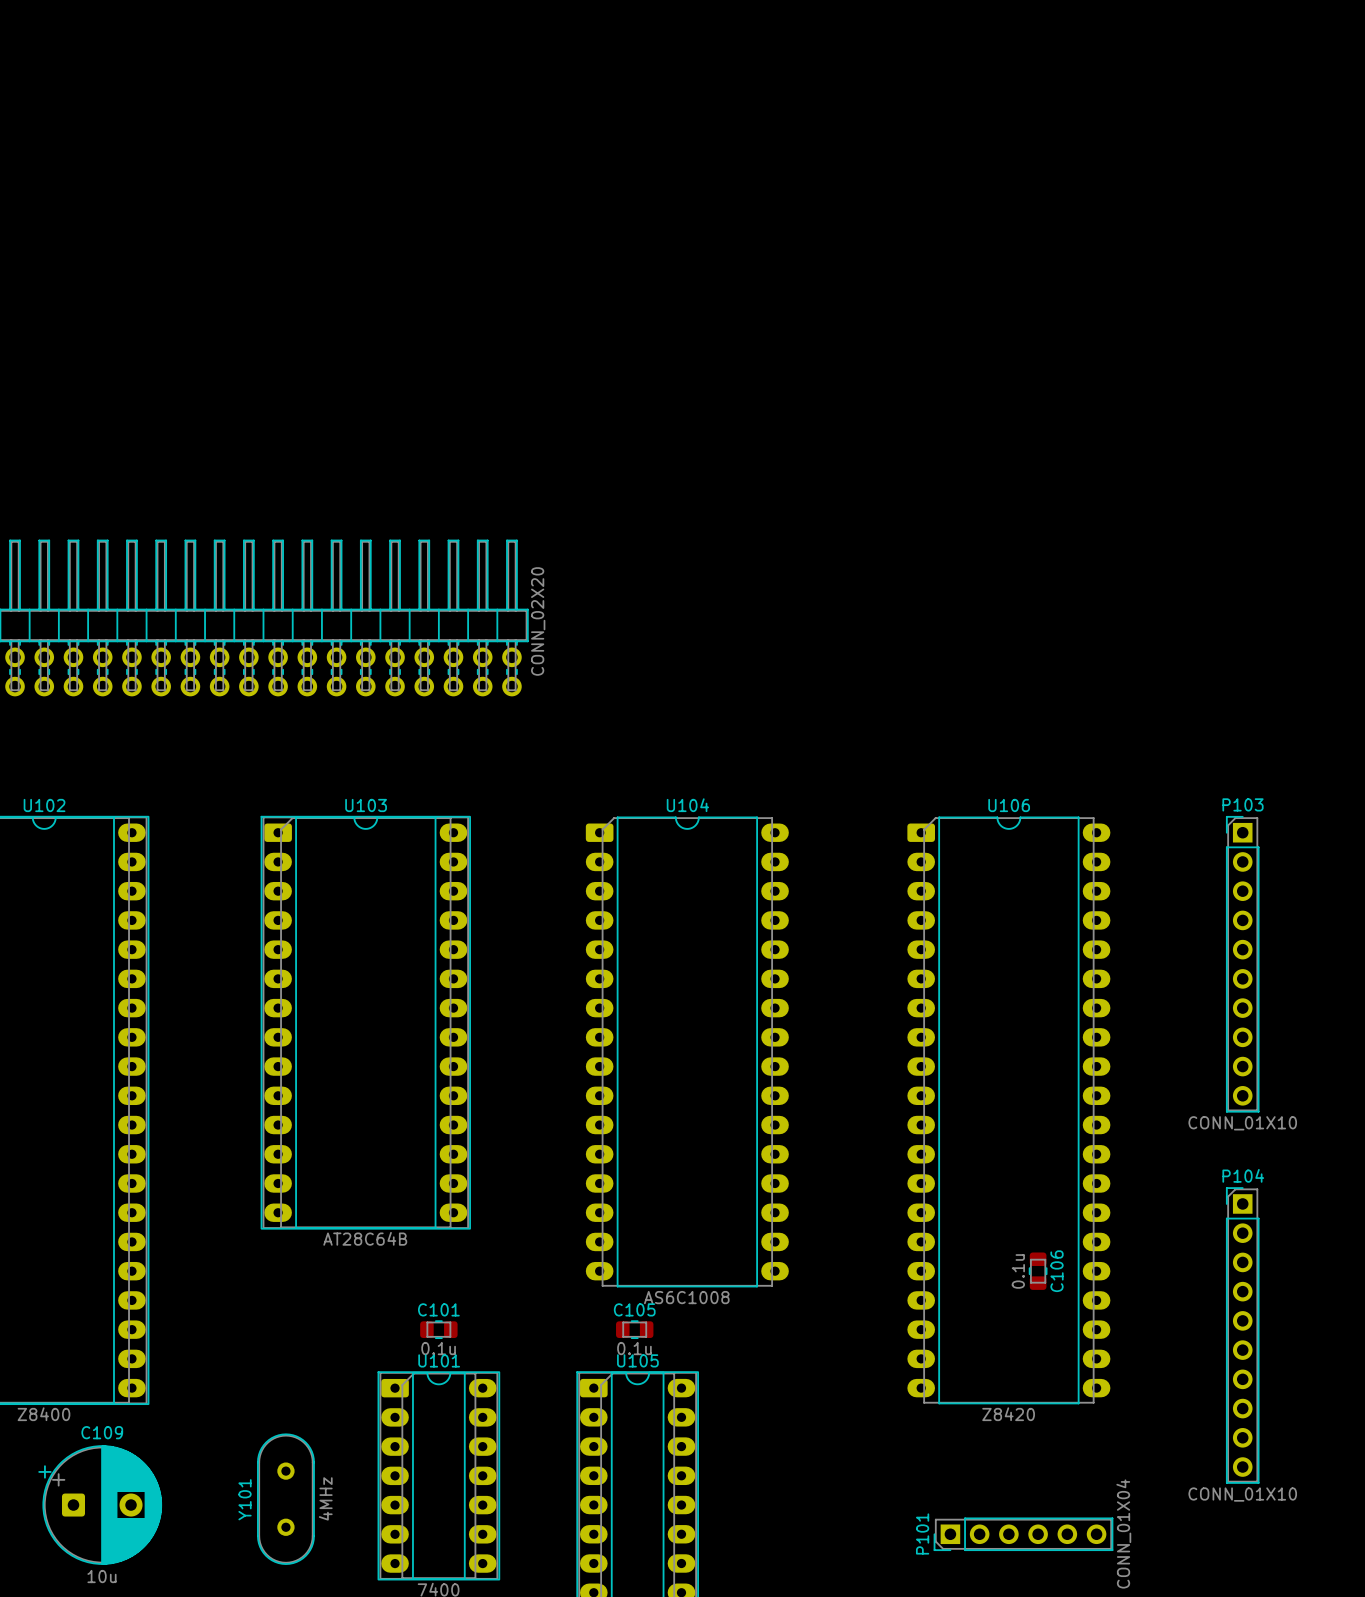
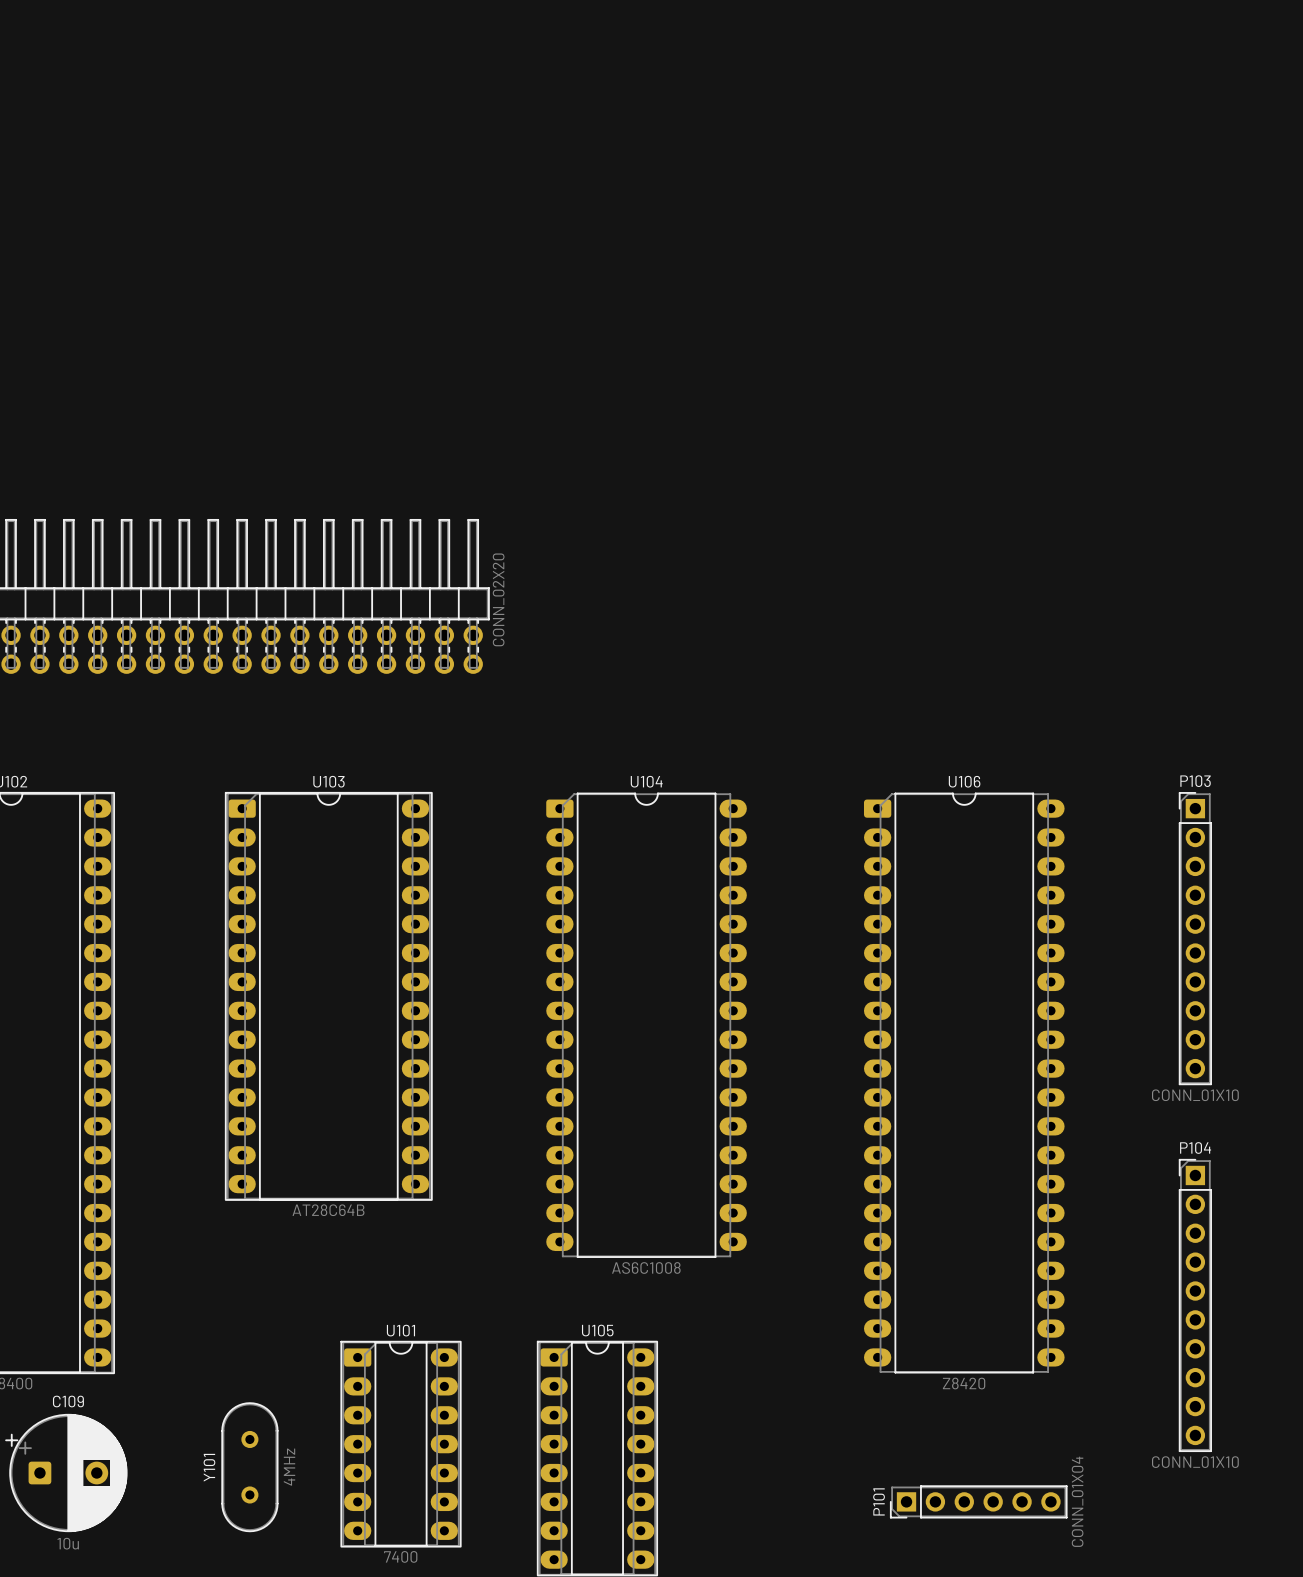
C106: 0.1u (1038, 1271) -> none
C101: 0.1u (438, 1329) -> none
C105: 0.1u (634, 1329) -> none

